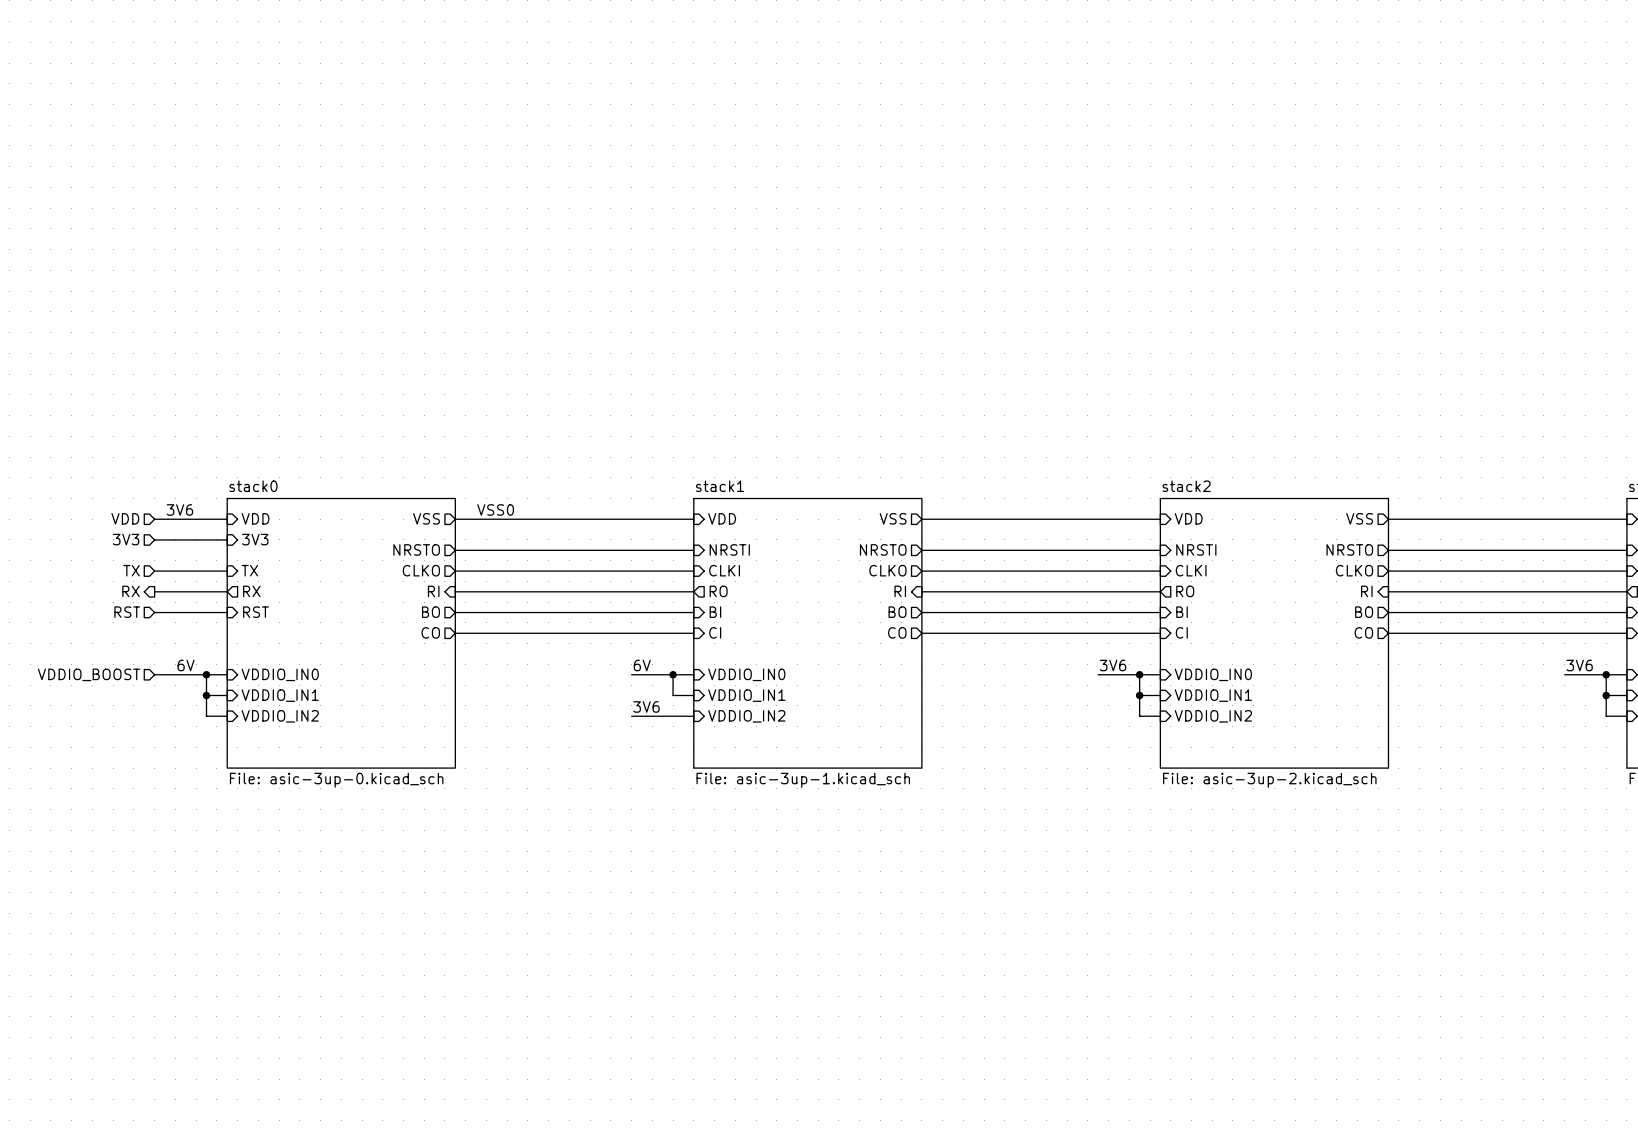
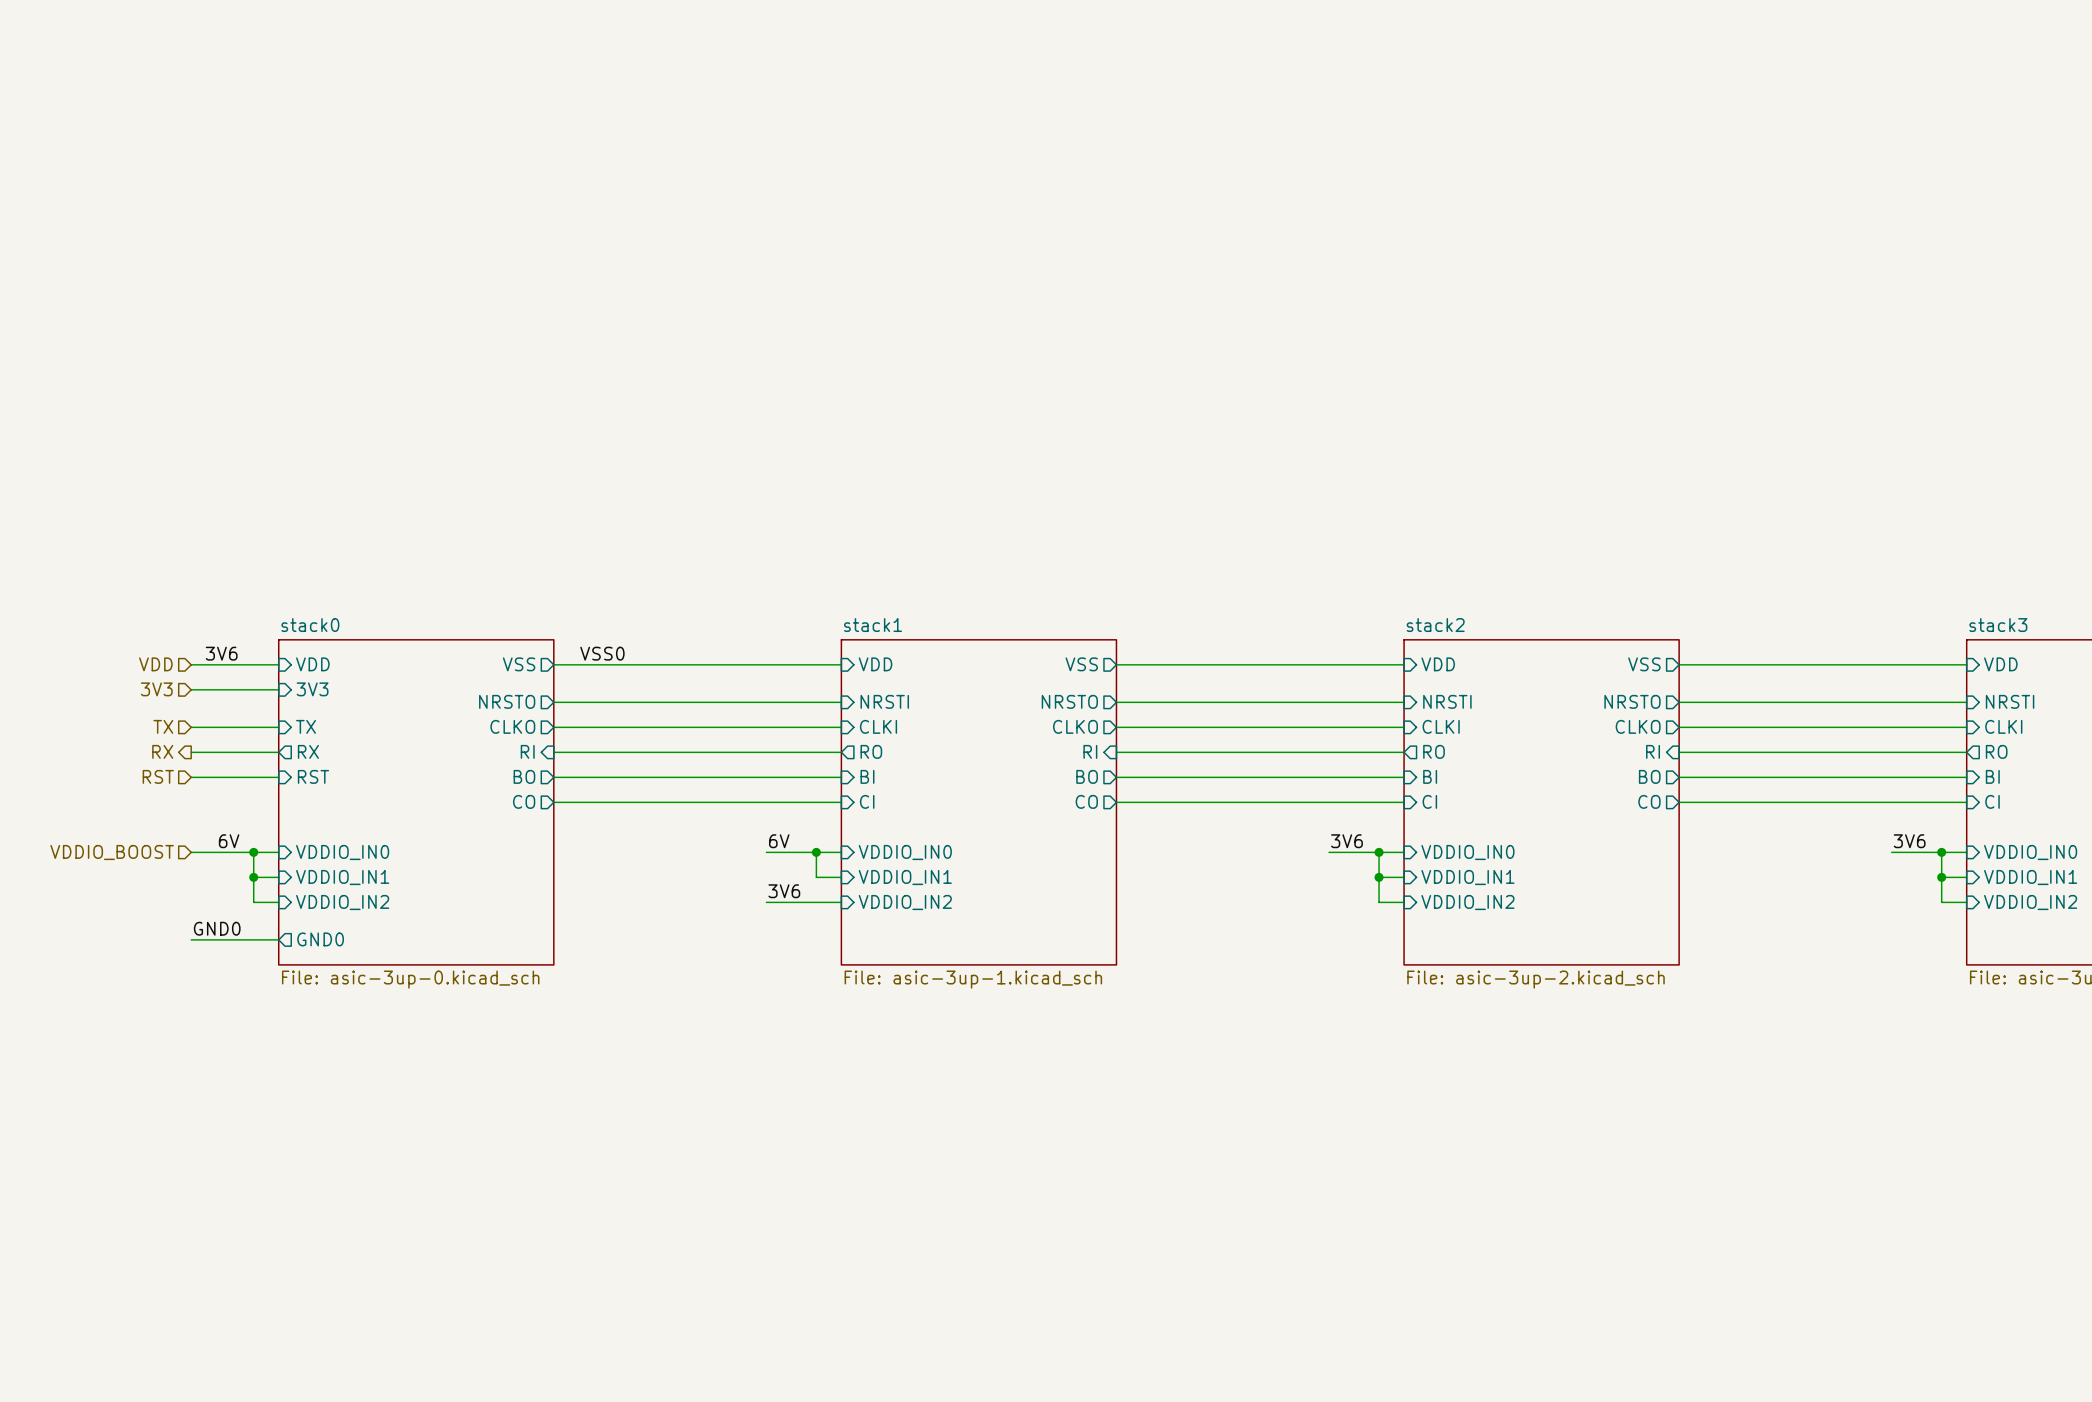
label: none -> GND0 (217, 928)
sheet pin: none -> GND0 (320, 939)
wire: none -> (191, 939) (278, 939)

